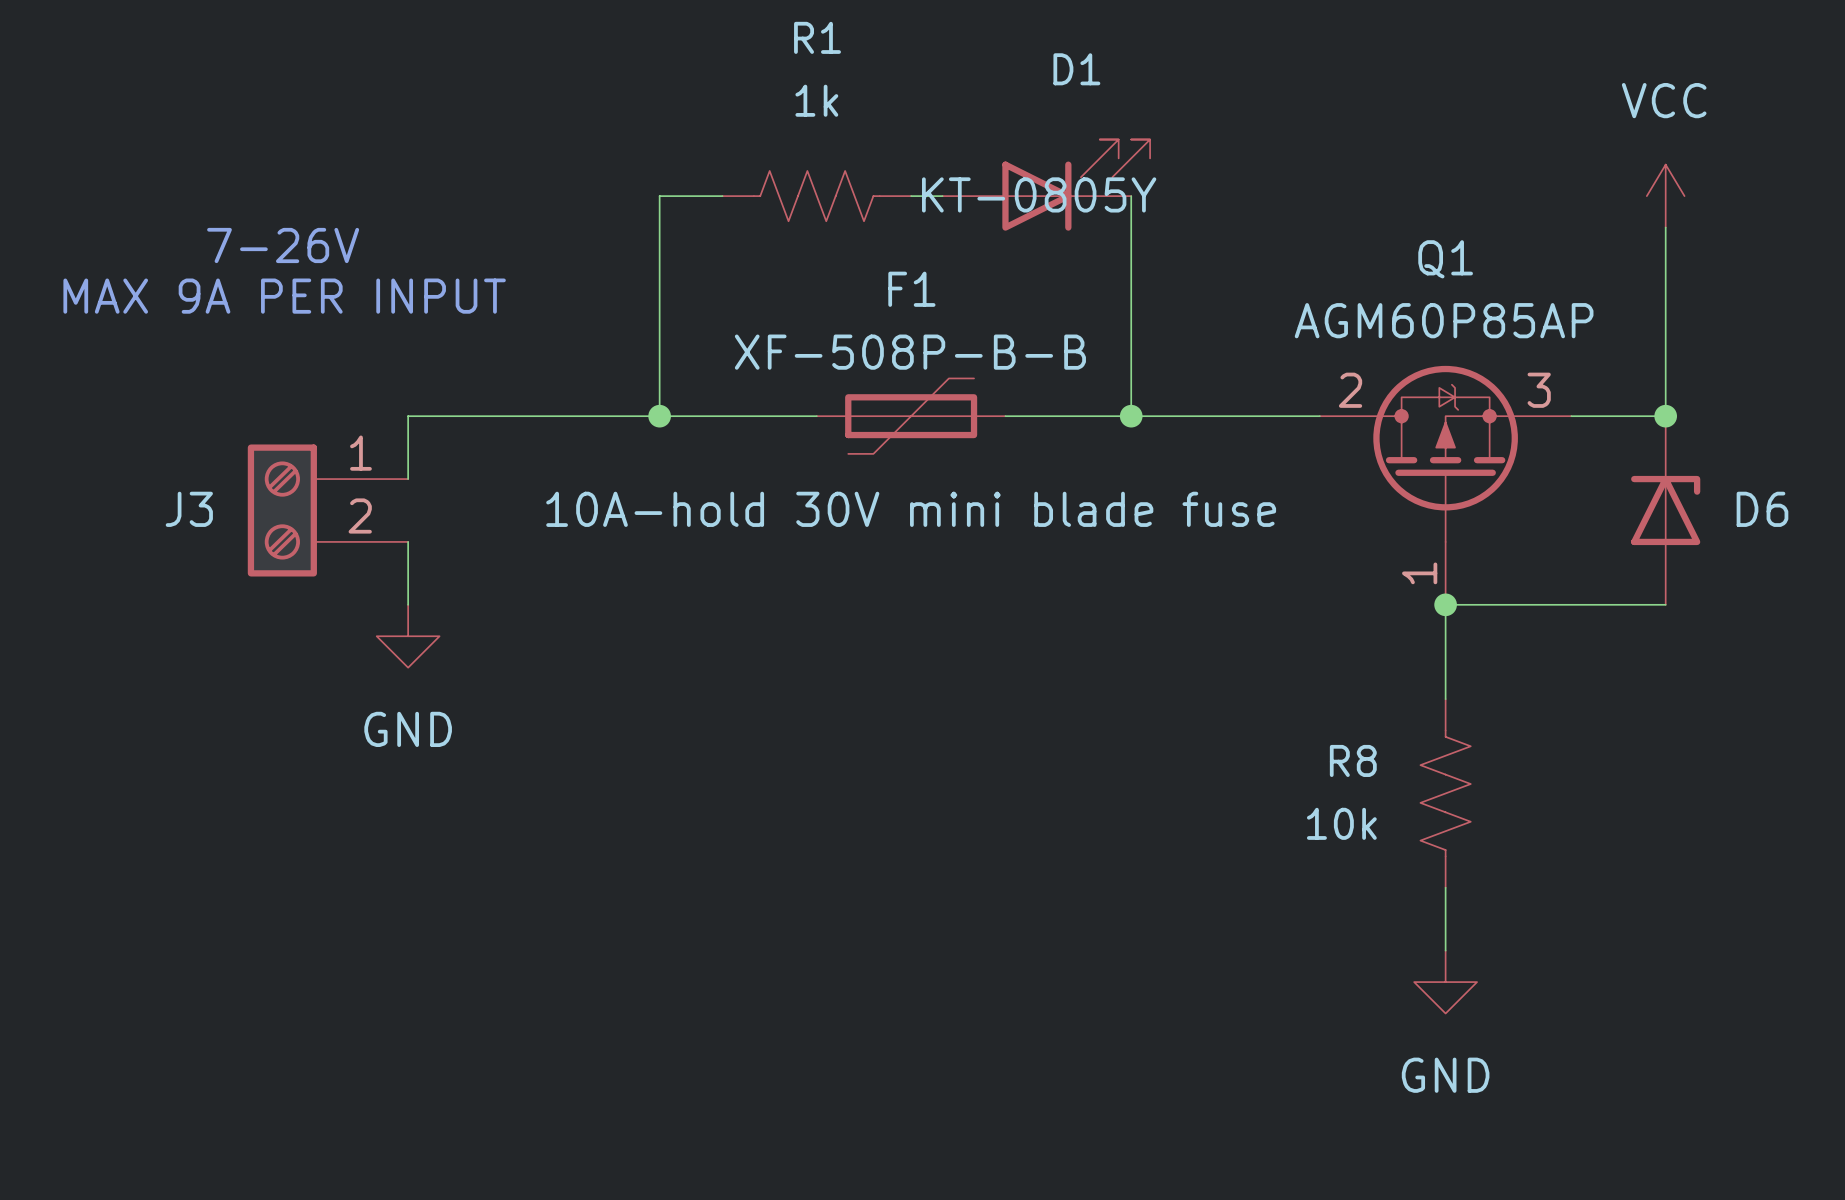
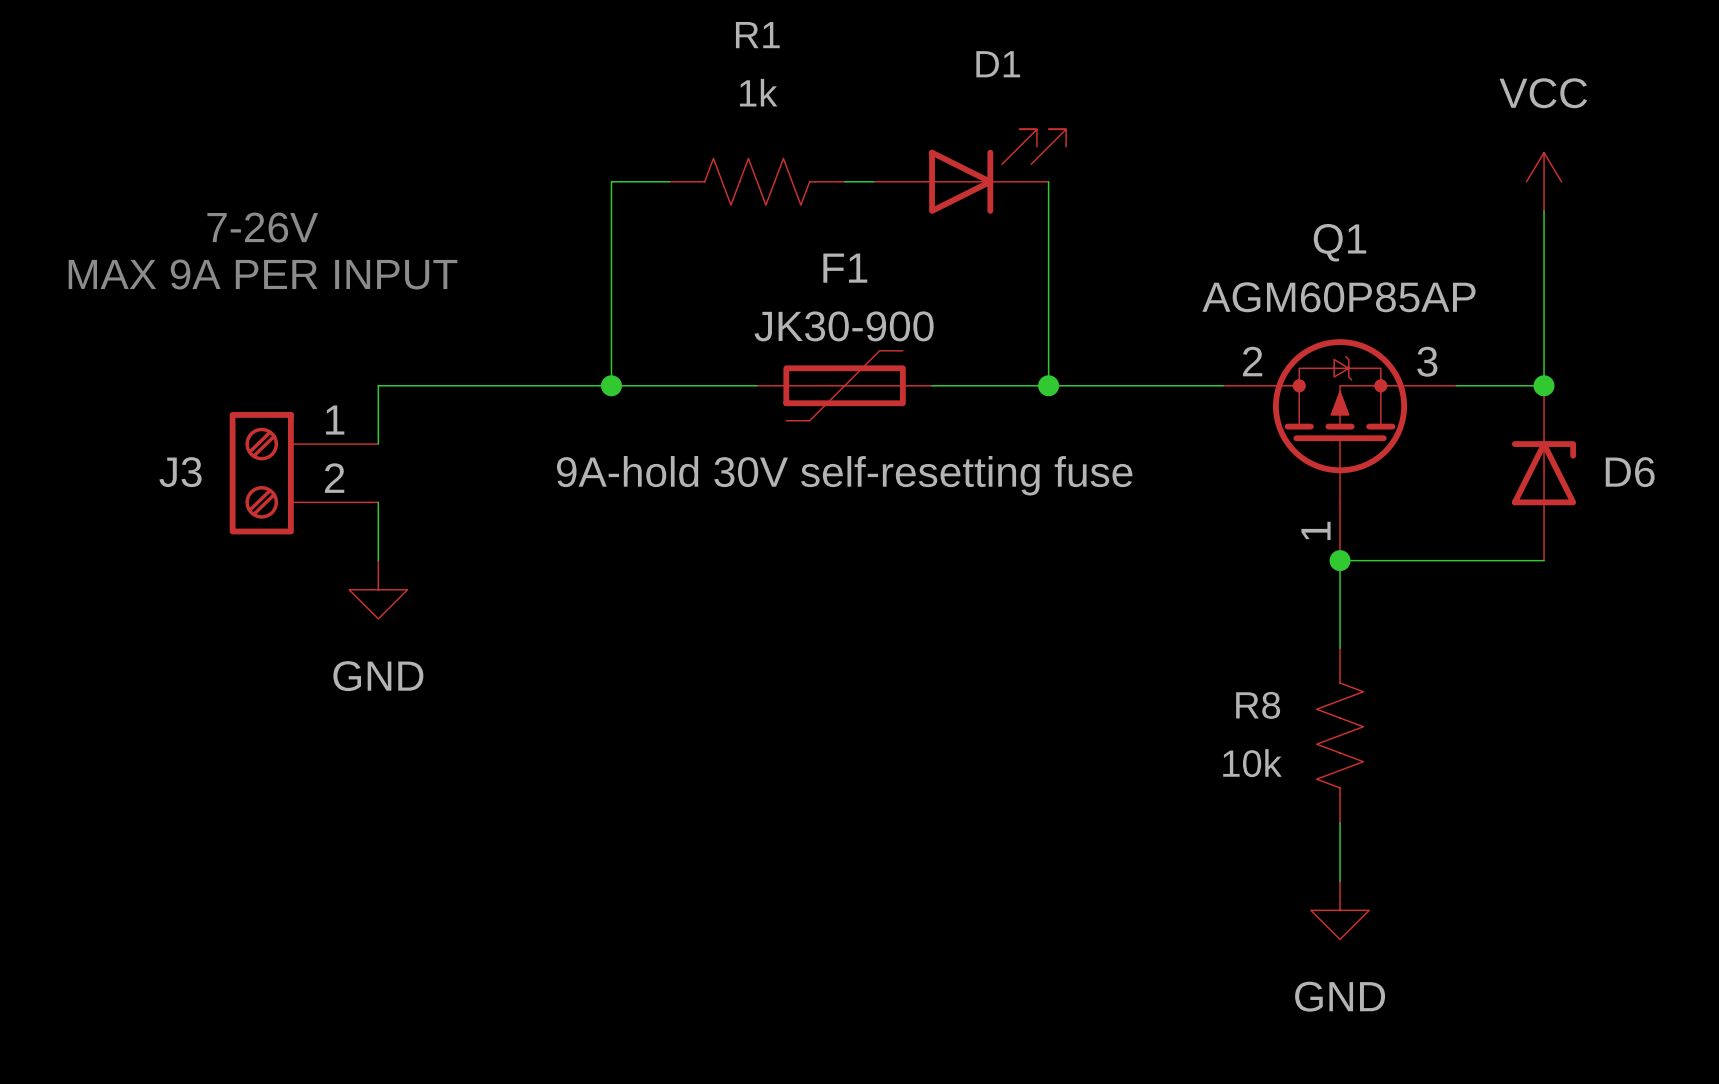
D1 text: KT-0805Y (1039, 194) -> none
F1 value: XF-508P-B-B (910, 352) -> JK30-900 (844, 326)
F1 text: 10A-hold 30V mini blade fuse (911, 509) -> 9A-hold 30V self-resetting fuse (844, 475)

